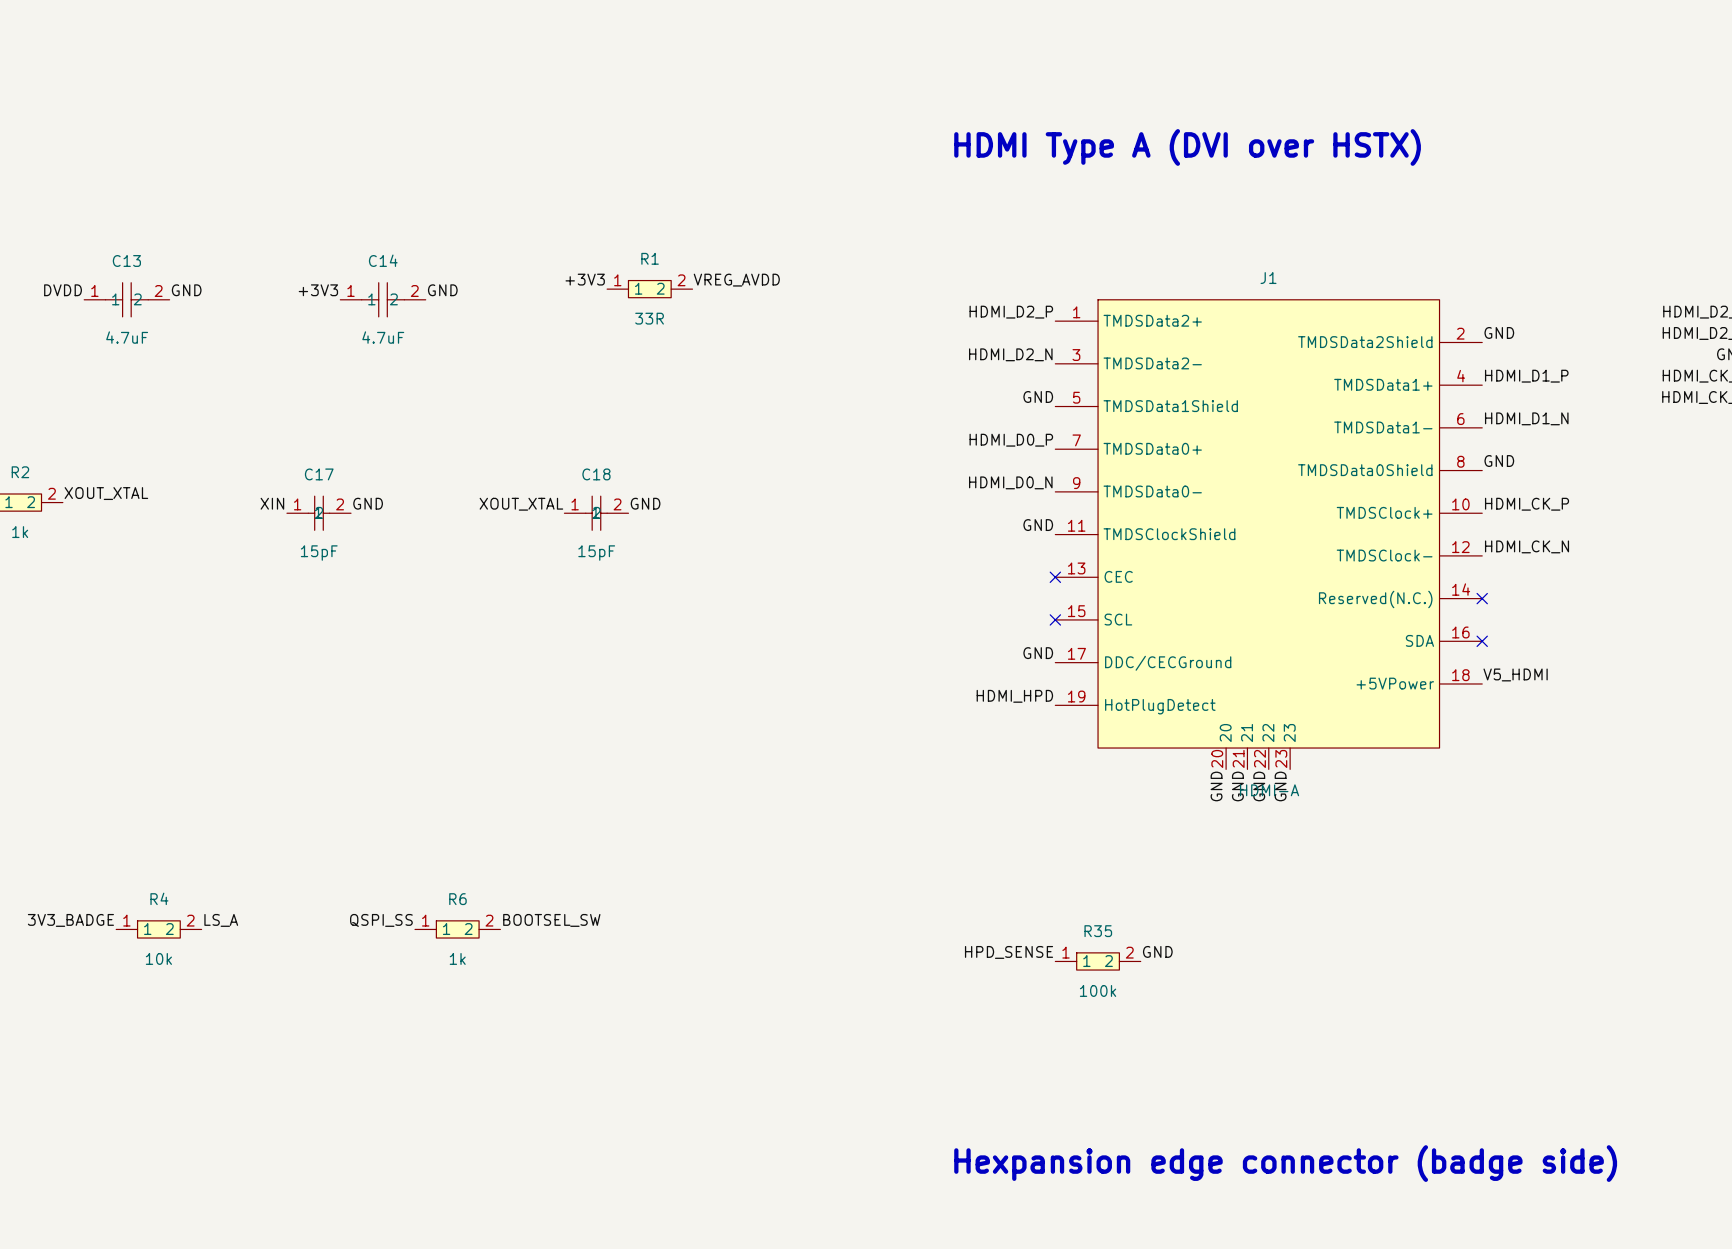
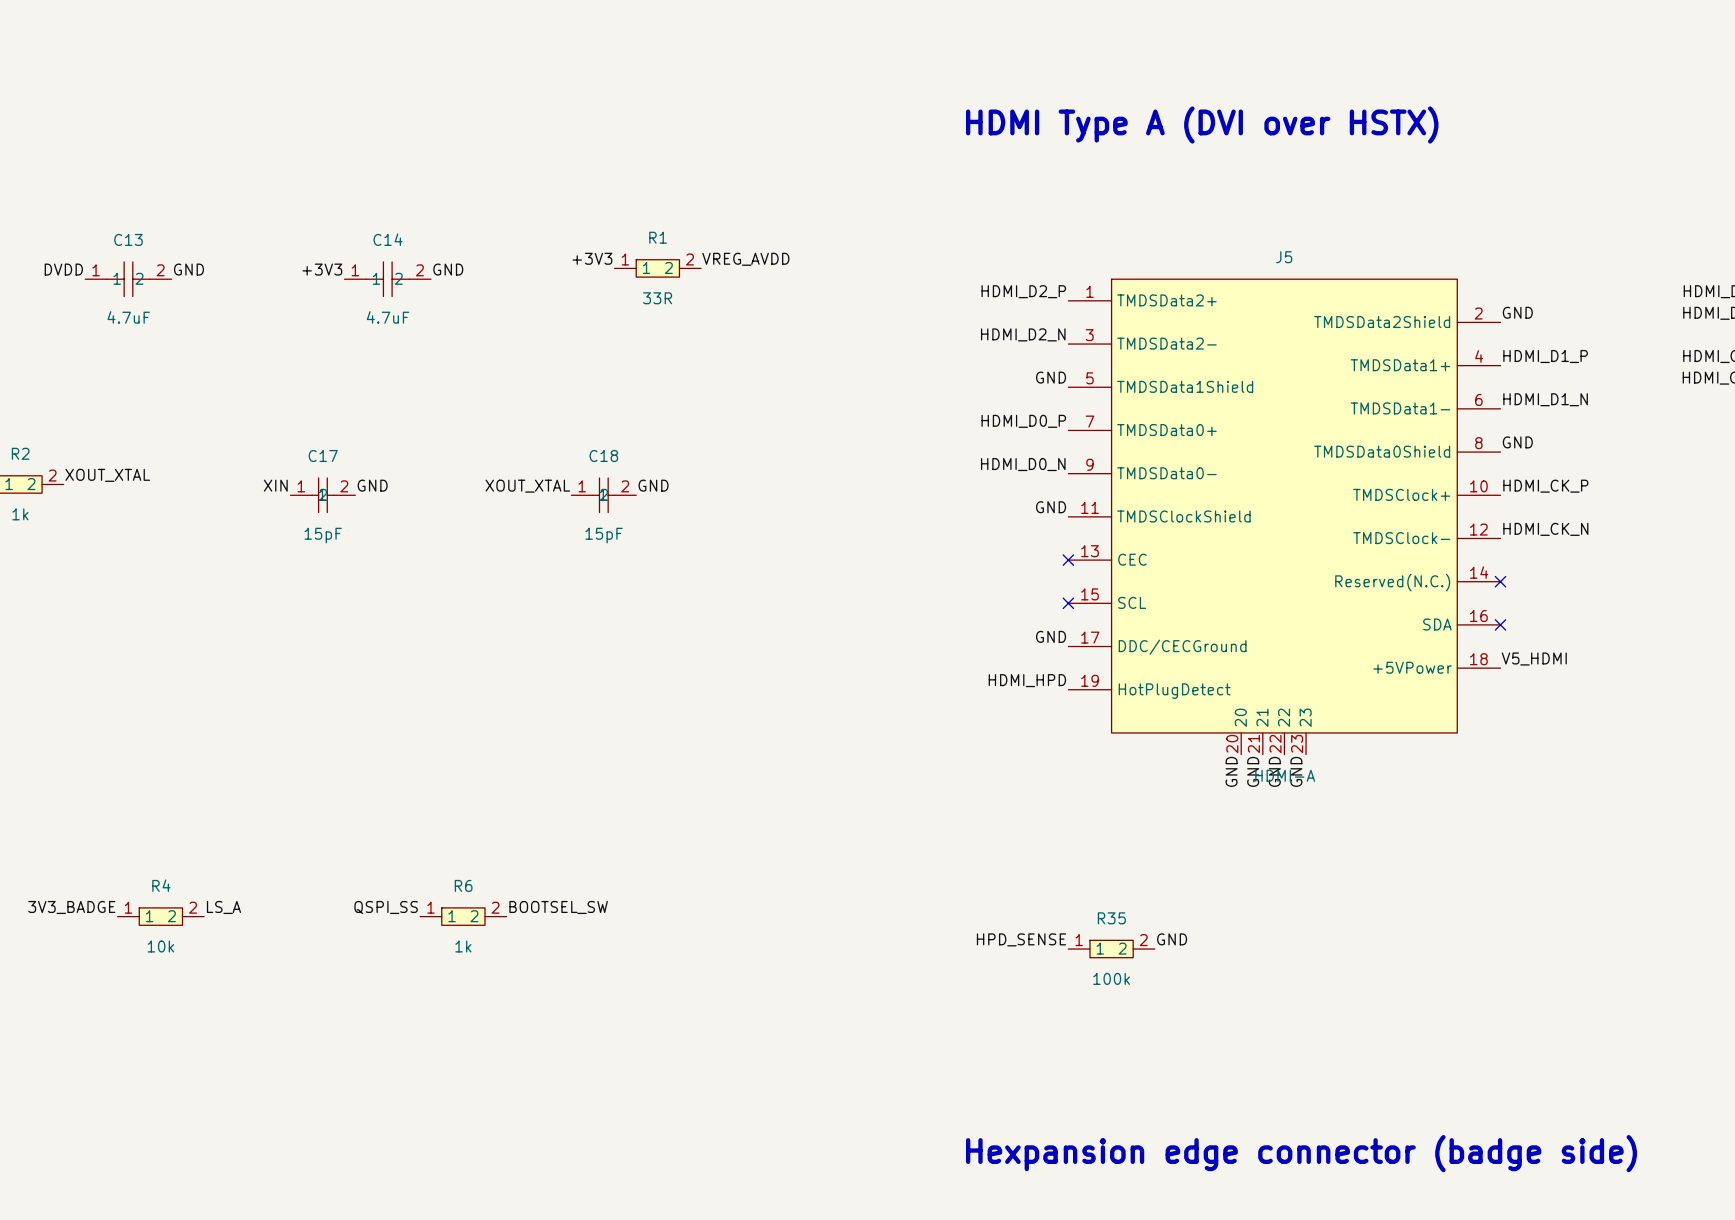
J1 name: J1 (1268, 278) -> J5 (1284, 257)

